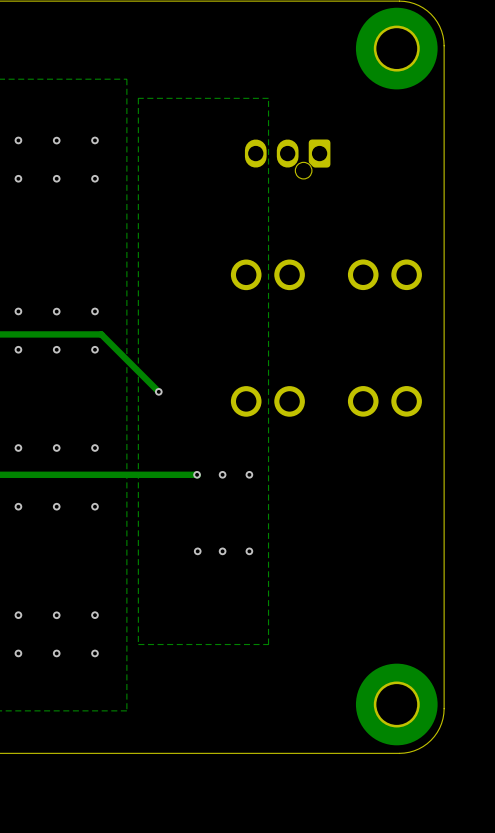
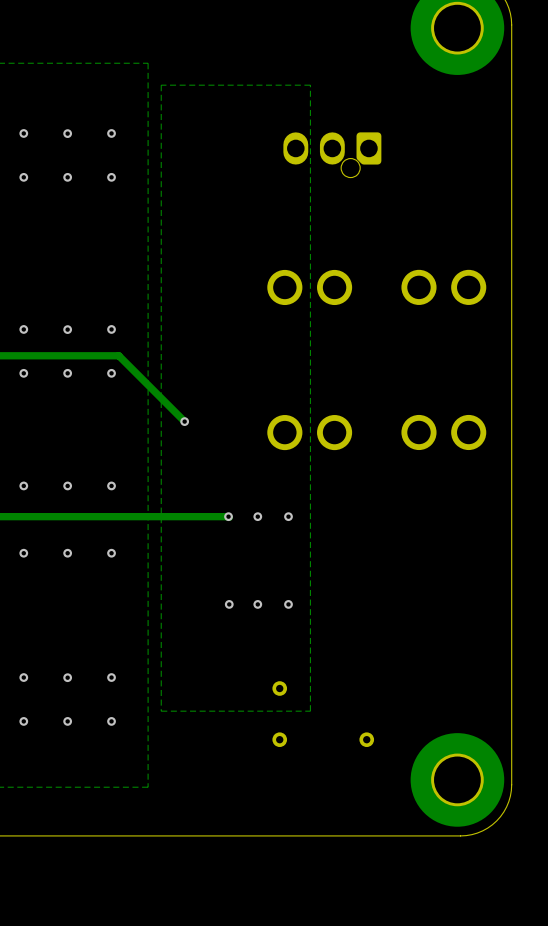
part: none -> (279, 688)
part: none -> (279, 739)
part: none -> (366, 739)

